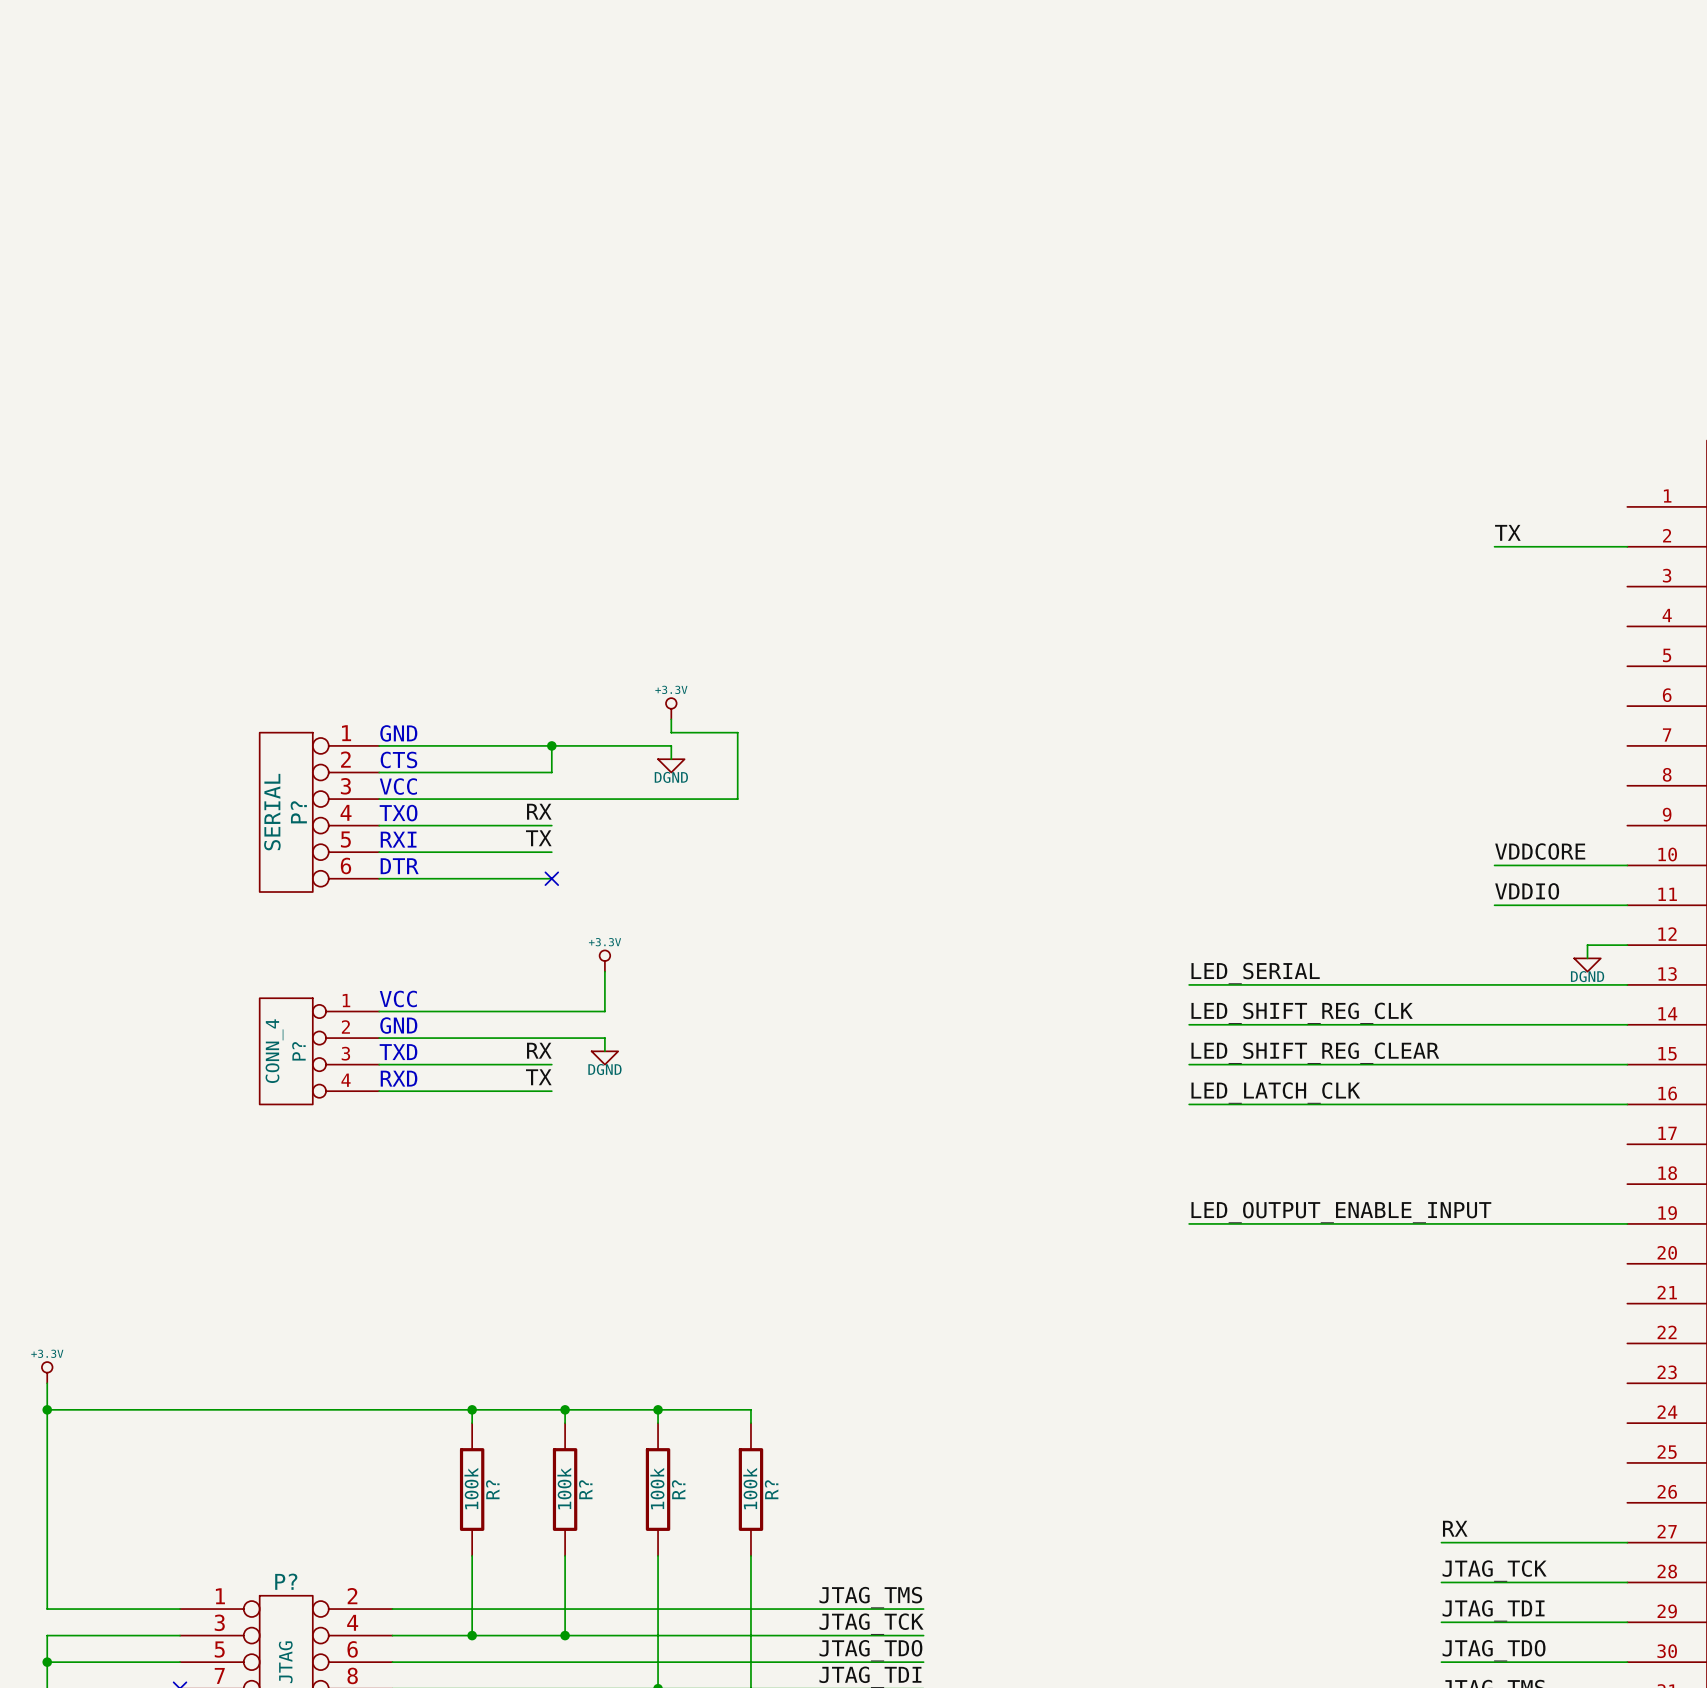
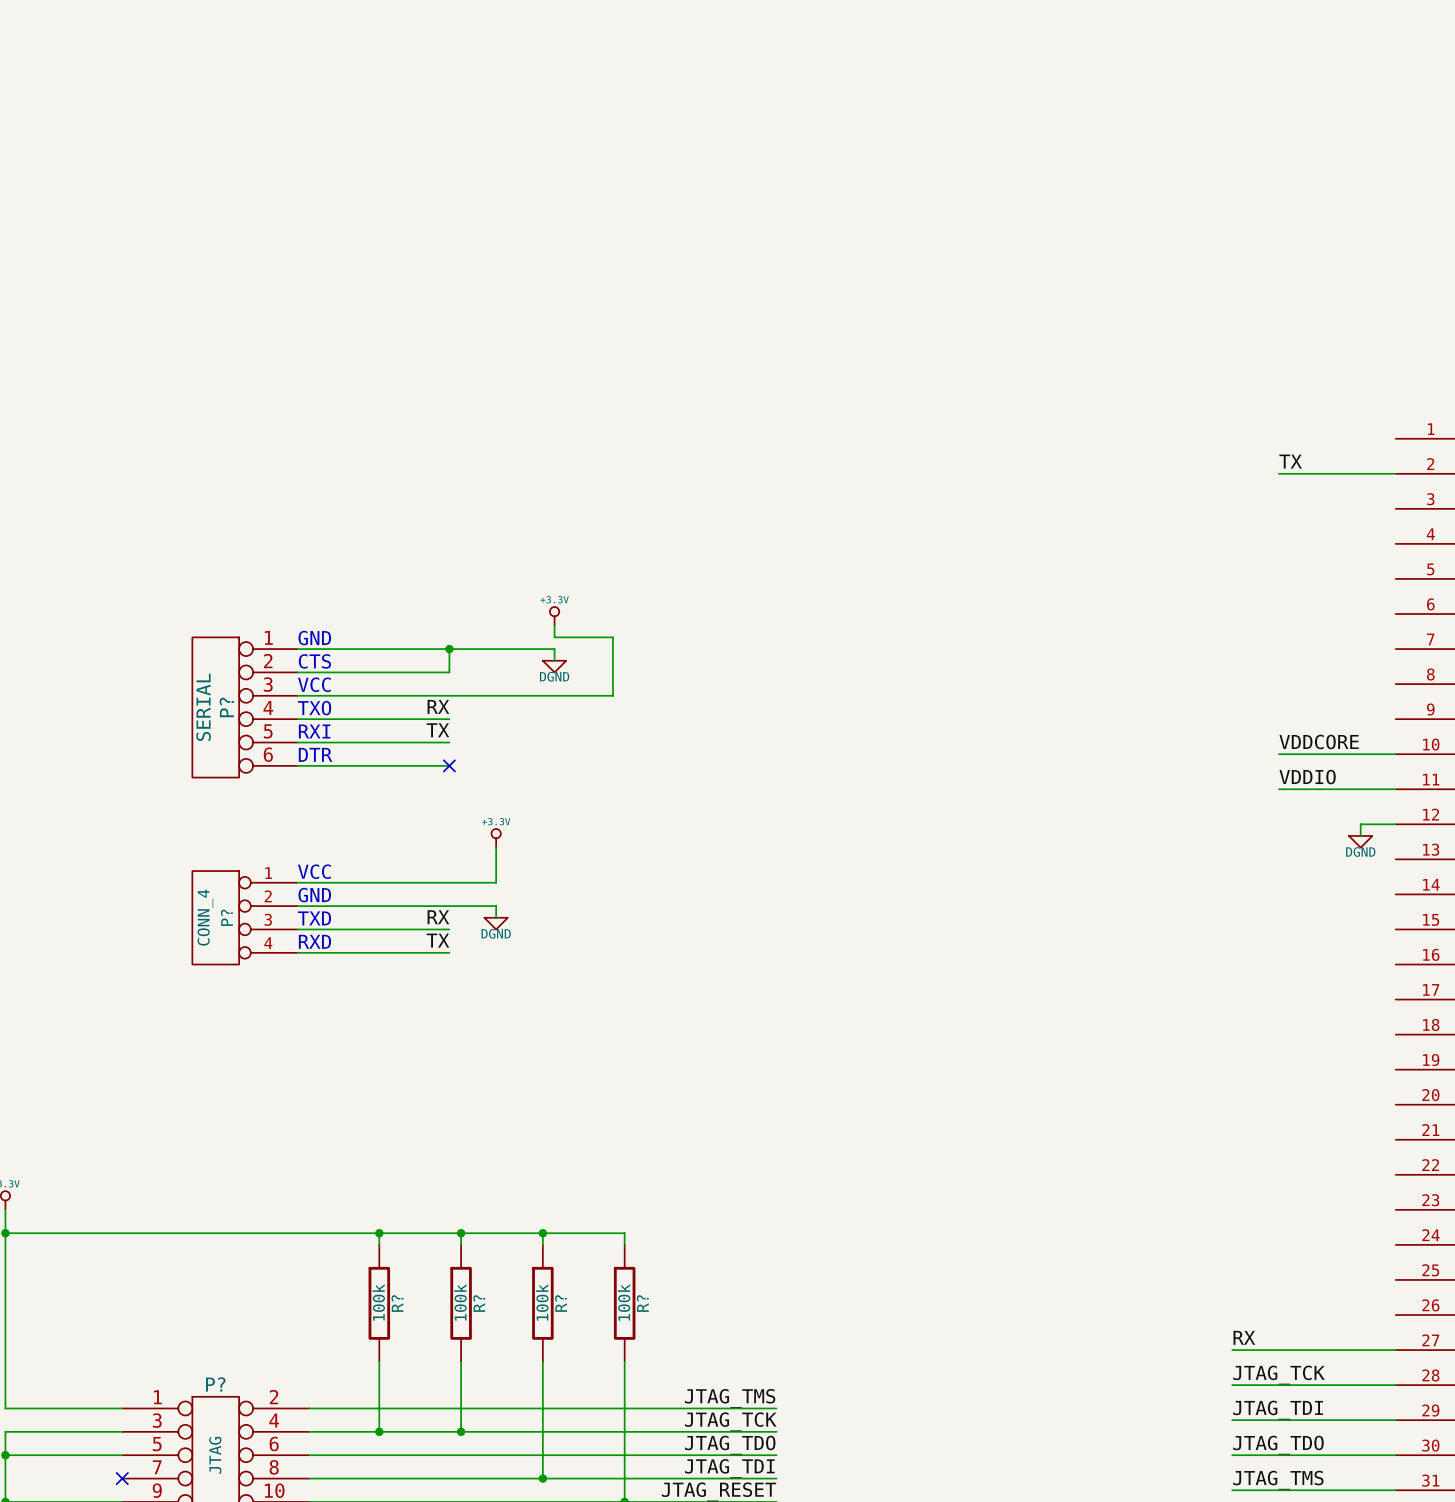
label: LED_SERIAL (1255, 973) -> none
wire: (1189, 984) (1627, 984) -> none
label: LED_SHIFT_REG_CLK (1302, 1013) -> none
wire: (1189, 1024) (1627, 1024) -> none
label: LED_SHIFT_REG_CLEAR (1315, 1053) -> none
wire: (1189, 1064) (1627, 1064) -> none
label: LED_LATCH_CLK (1275, 1092) -> none
wire: (1189, 1104) (1627, 1104) -> none
label: LED_OUTPUT_ENABLE_INPUT (1341, 1212) -> none
wire: (1189, 1223) (1627, 1223) -> none

